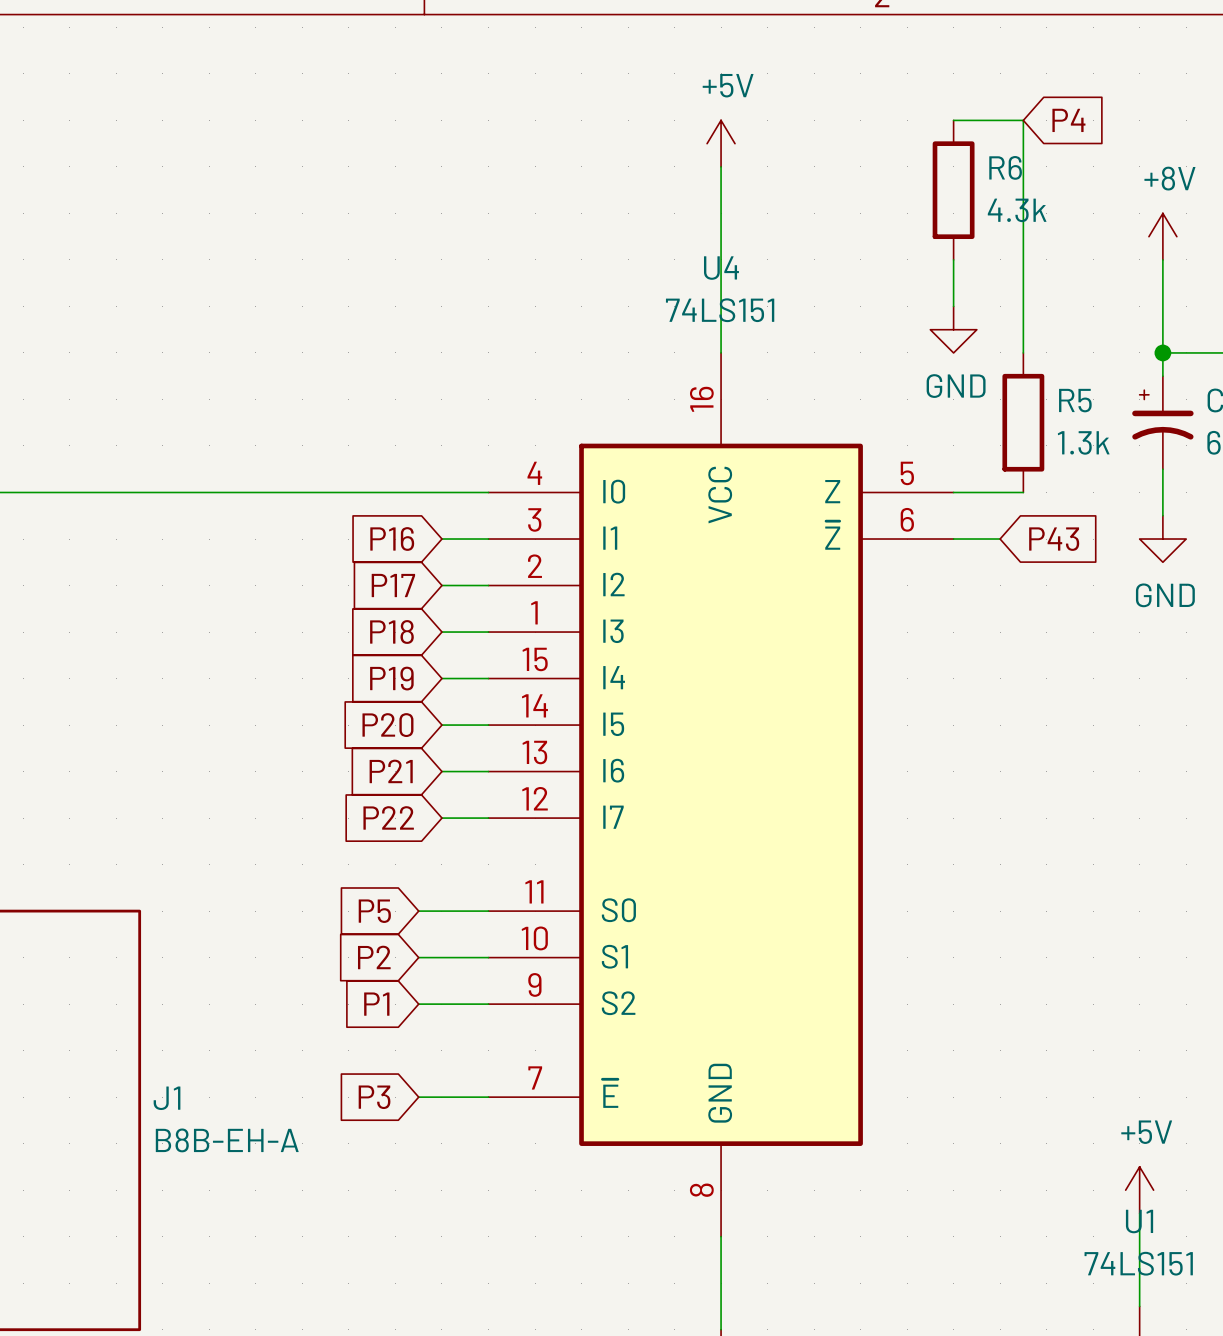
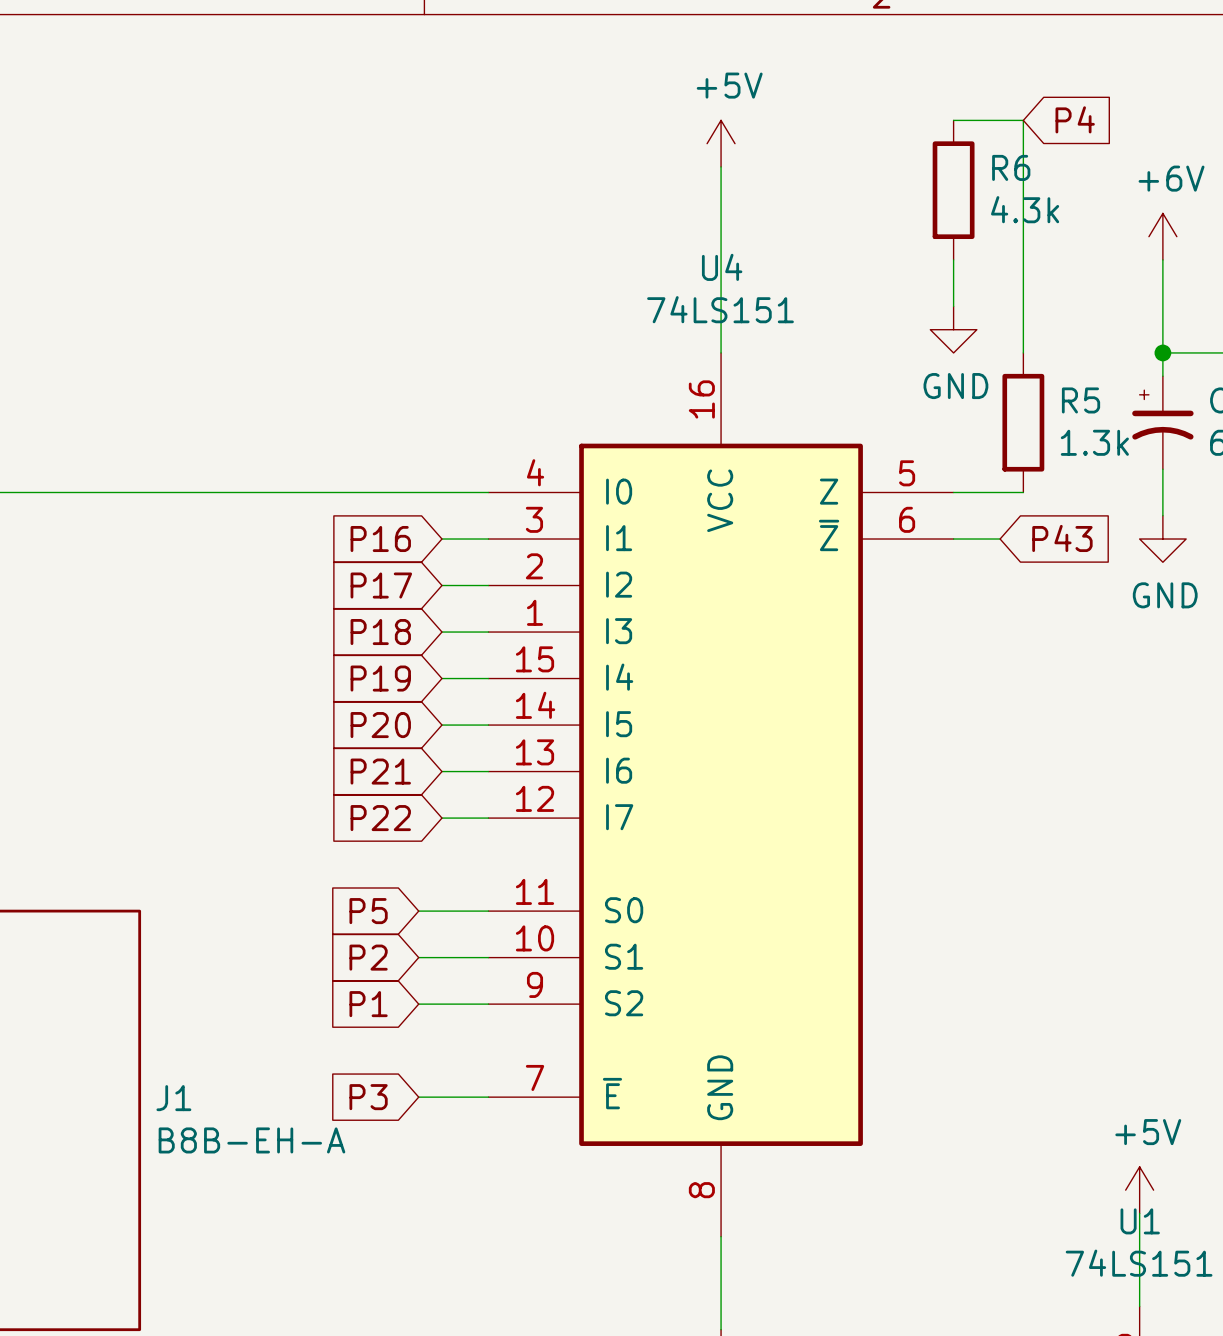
power symbol: +8V (1162, 236) -> +6V (1162, 236)

